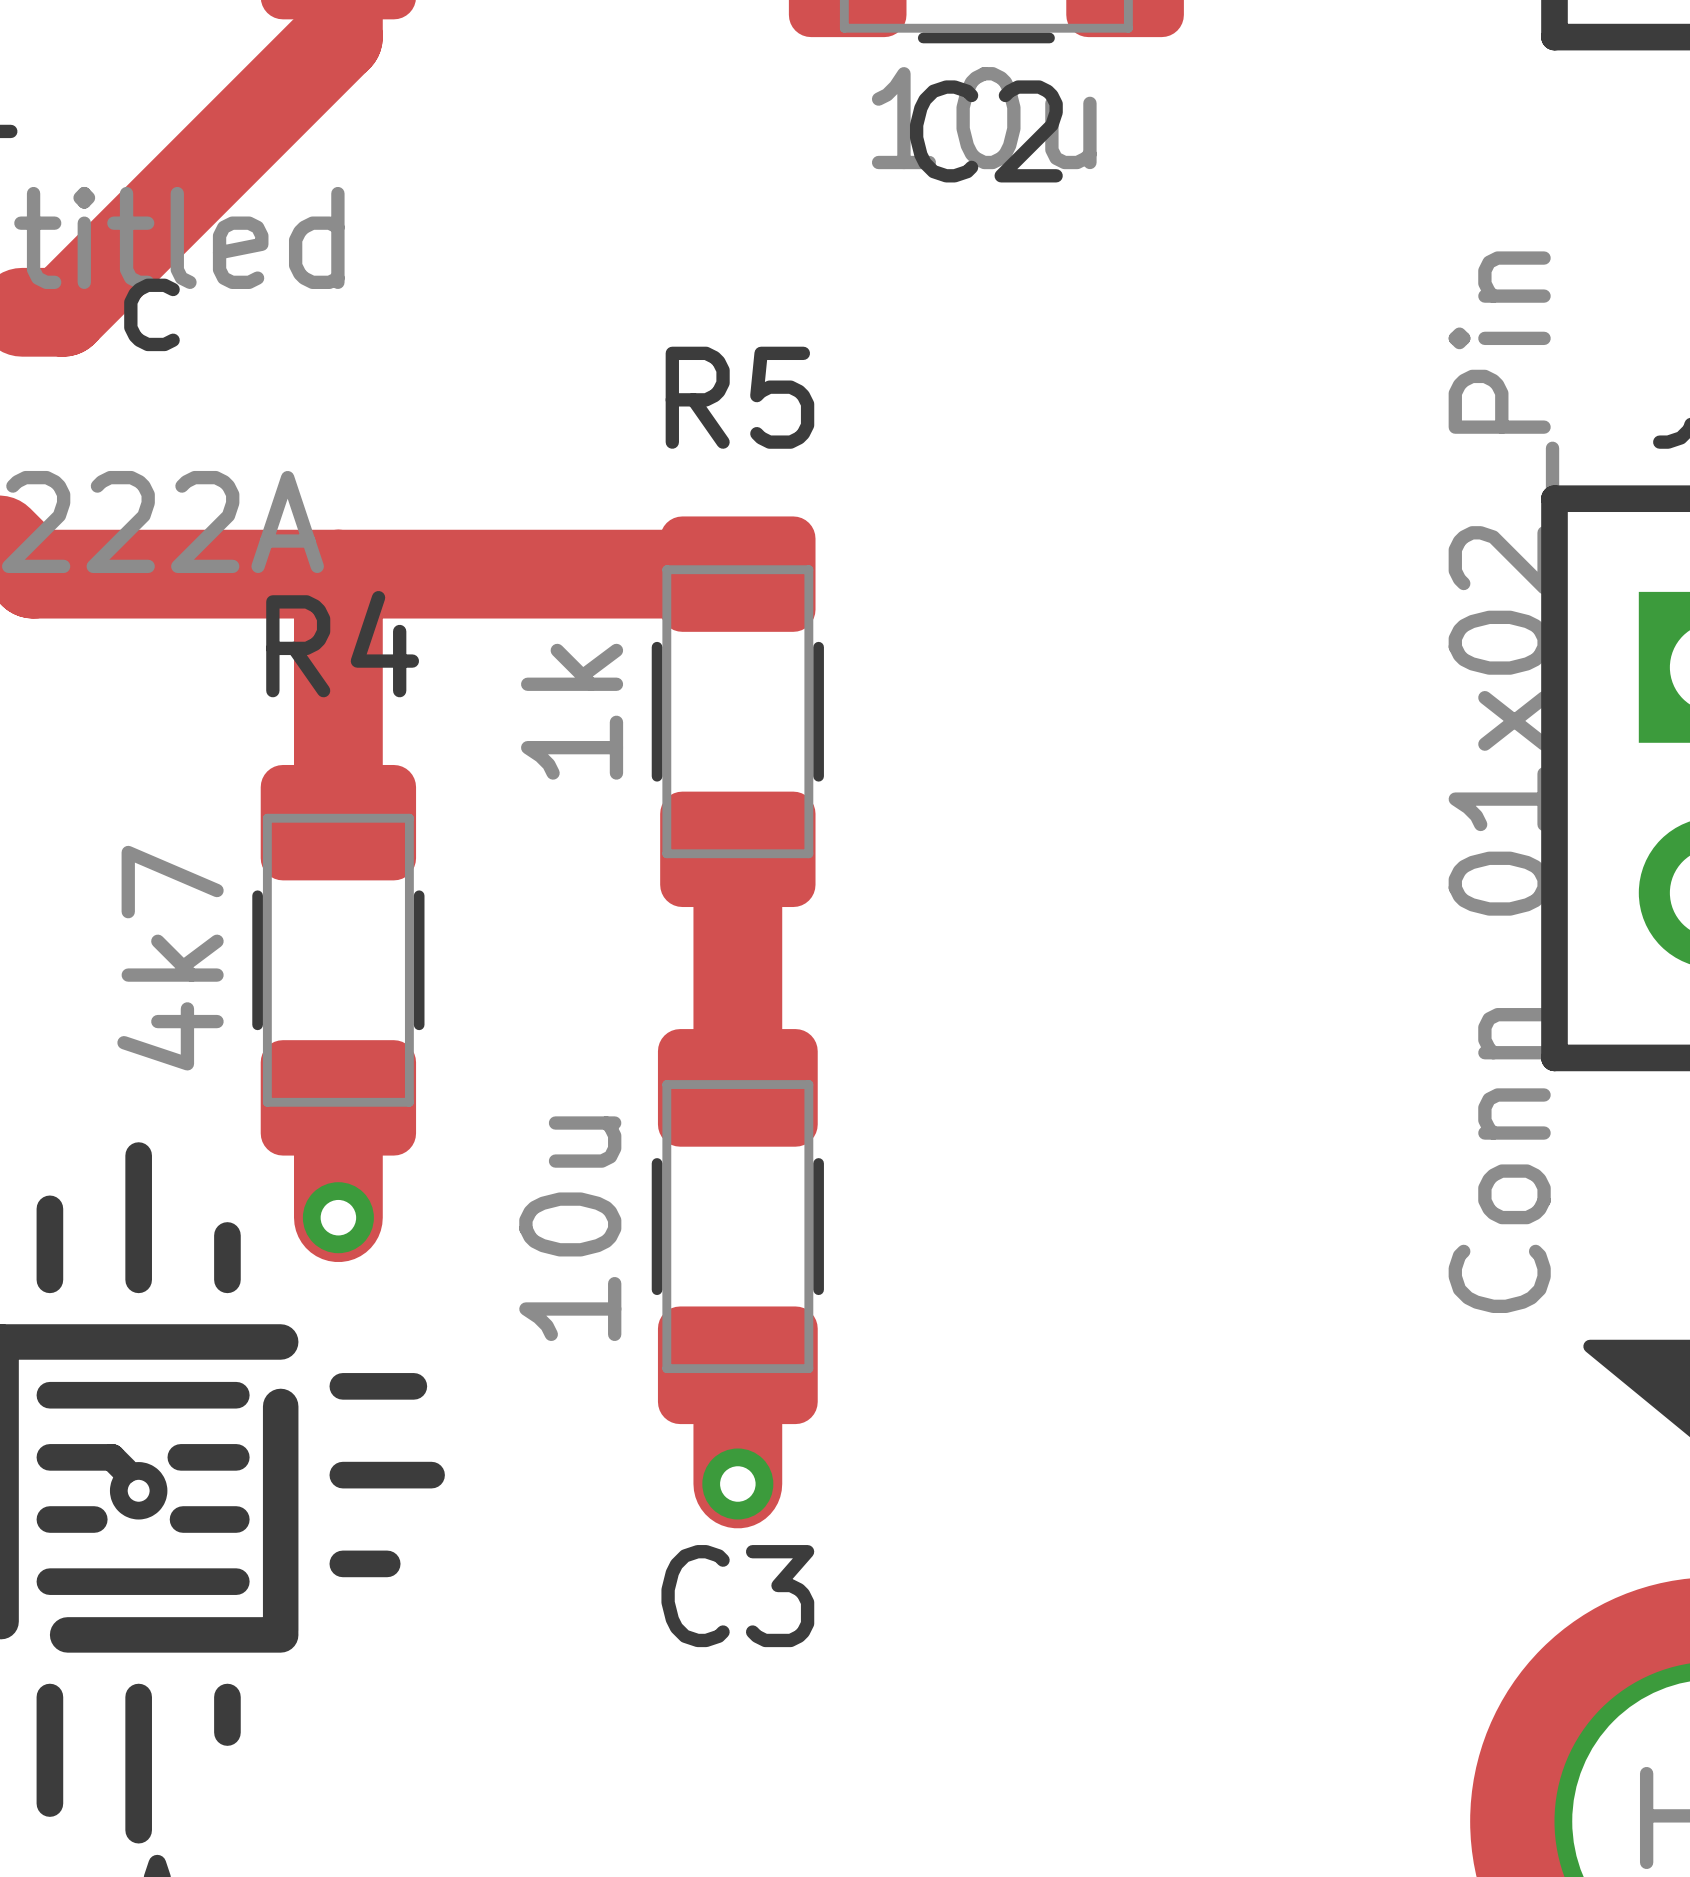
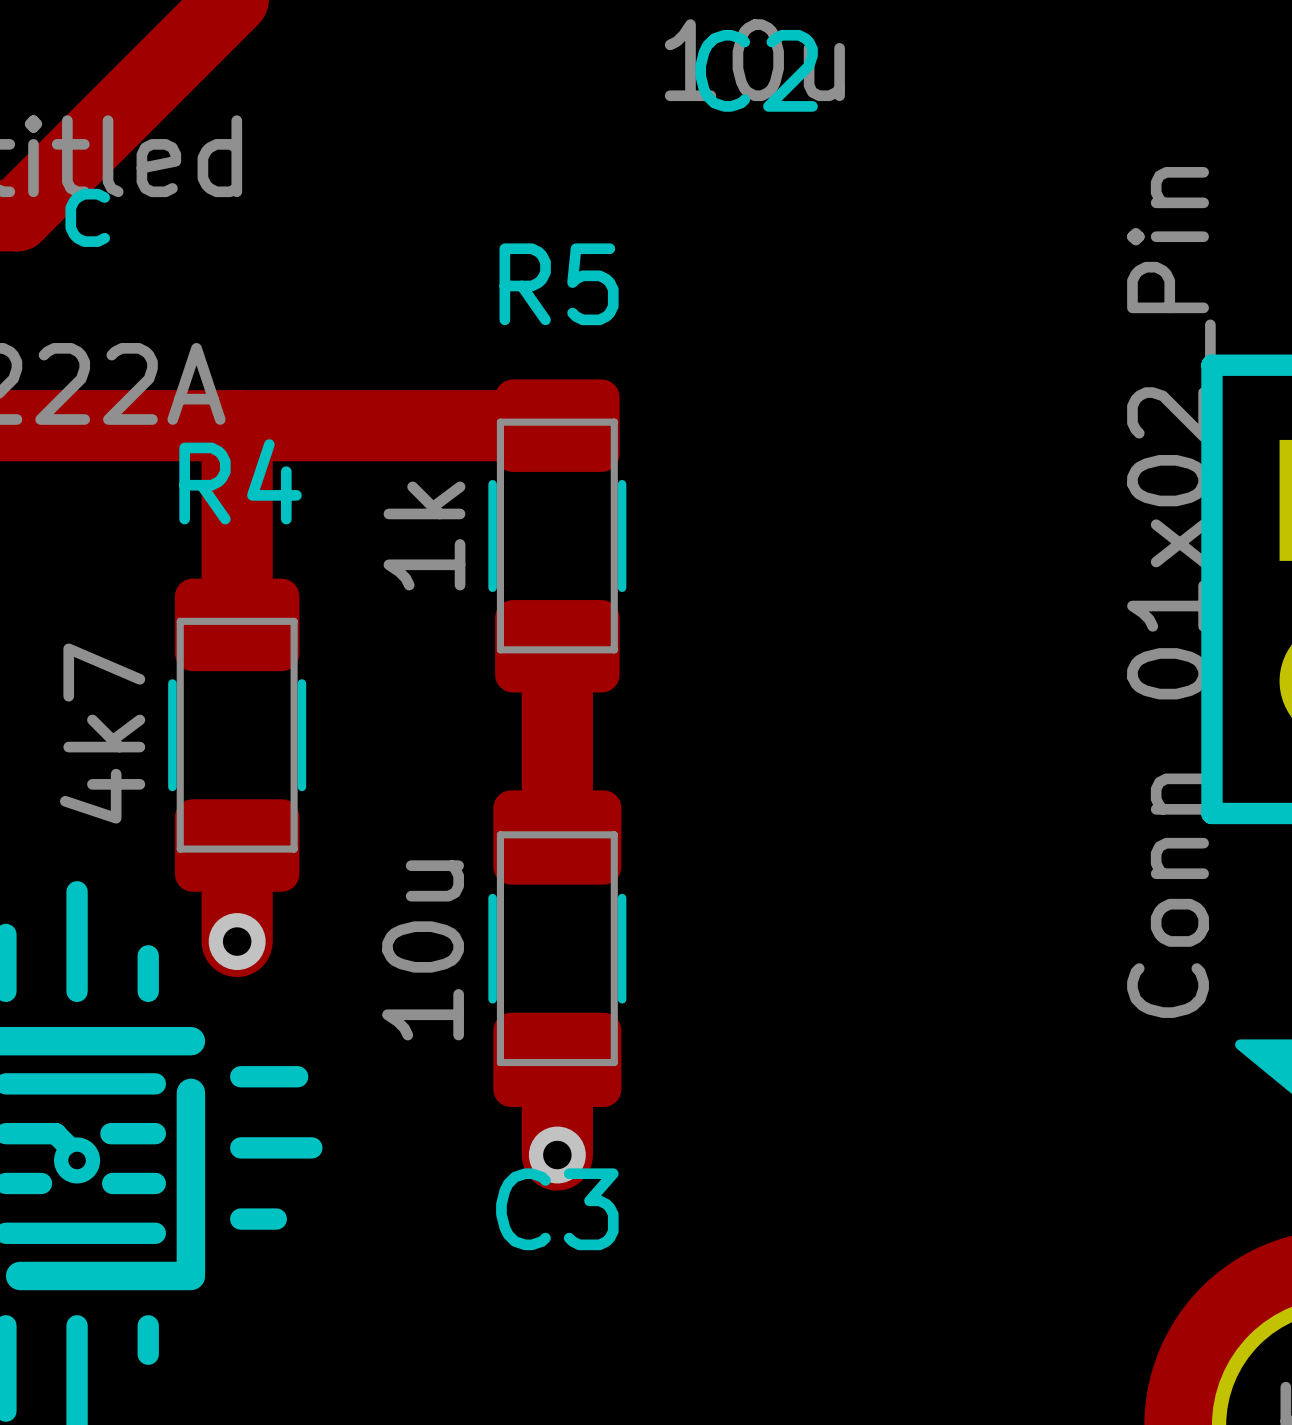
C3 name position: C3 (737, 1596) -> C3 (557, 1209)

